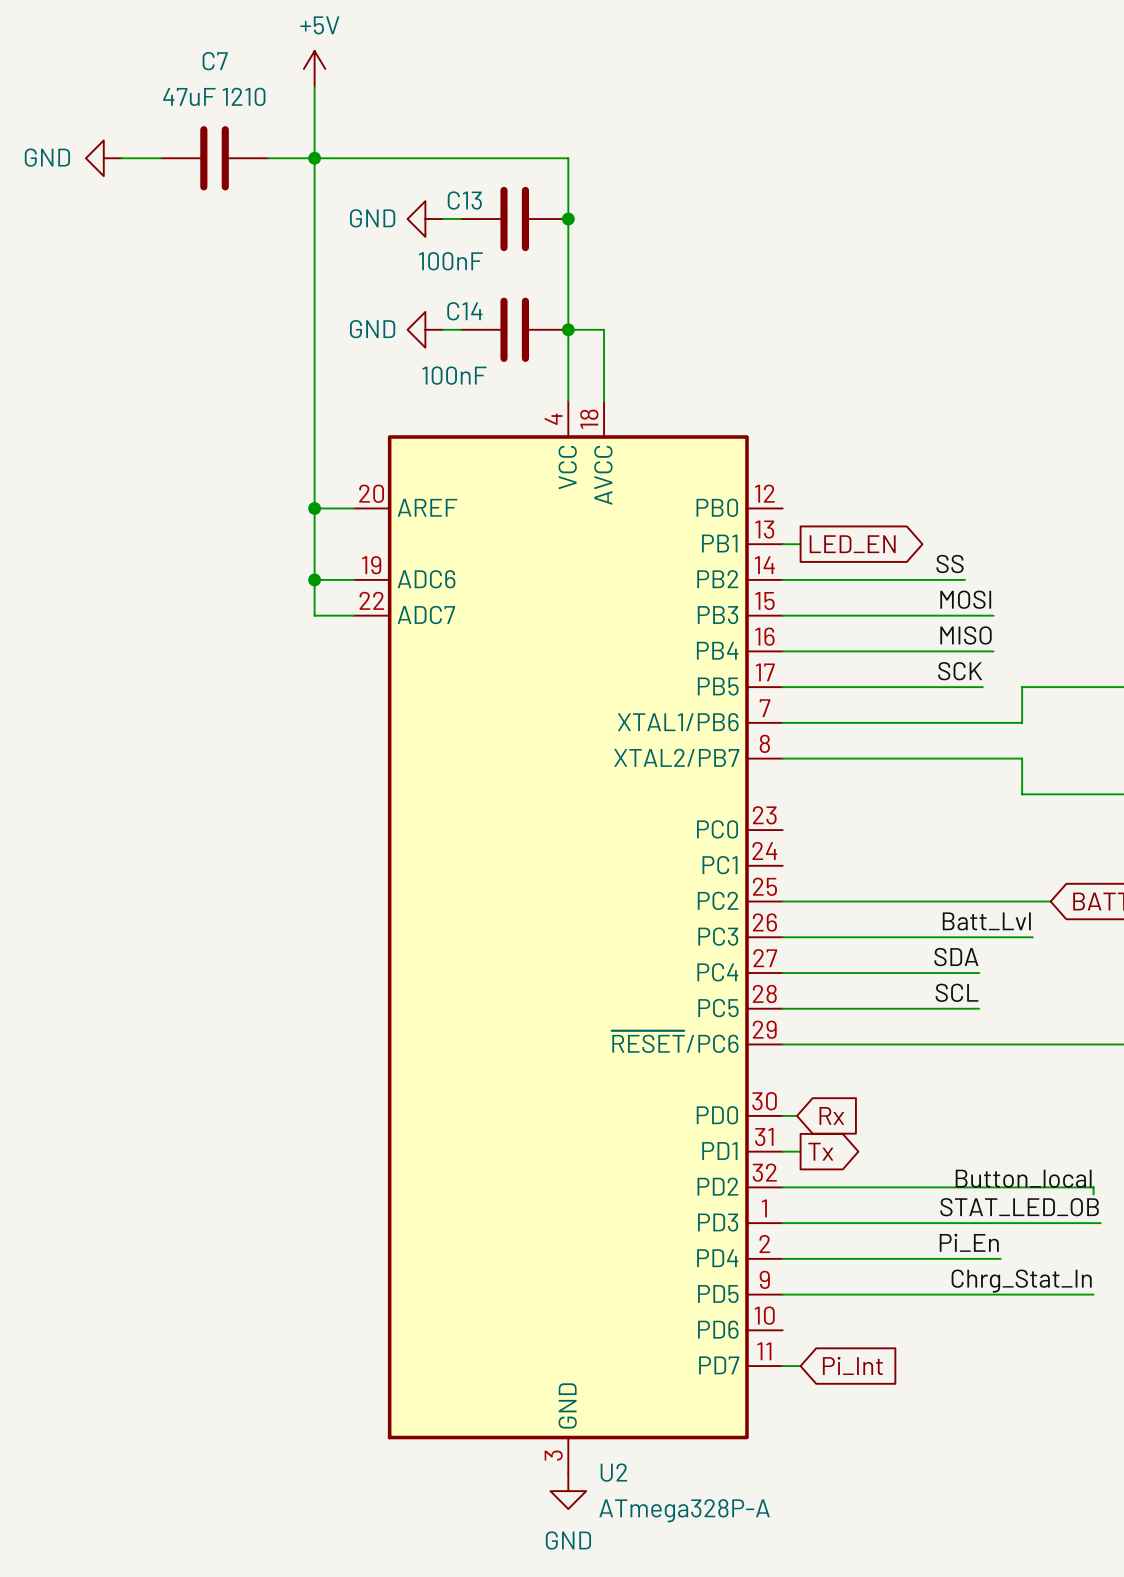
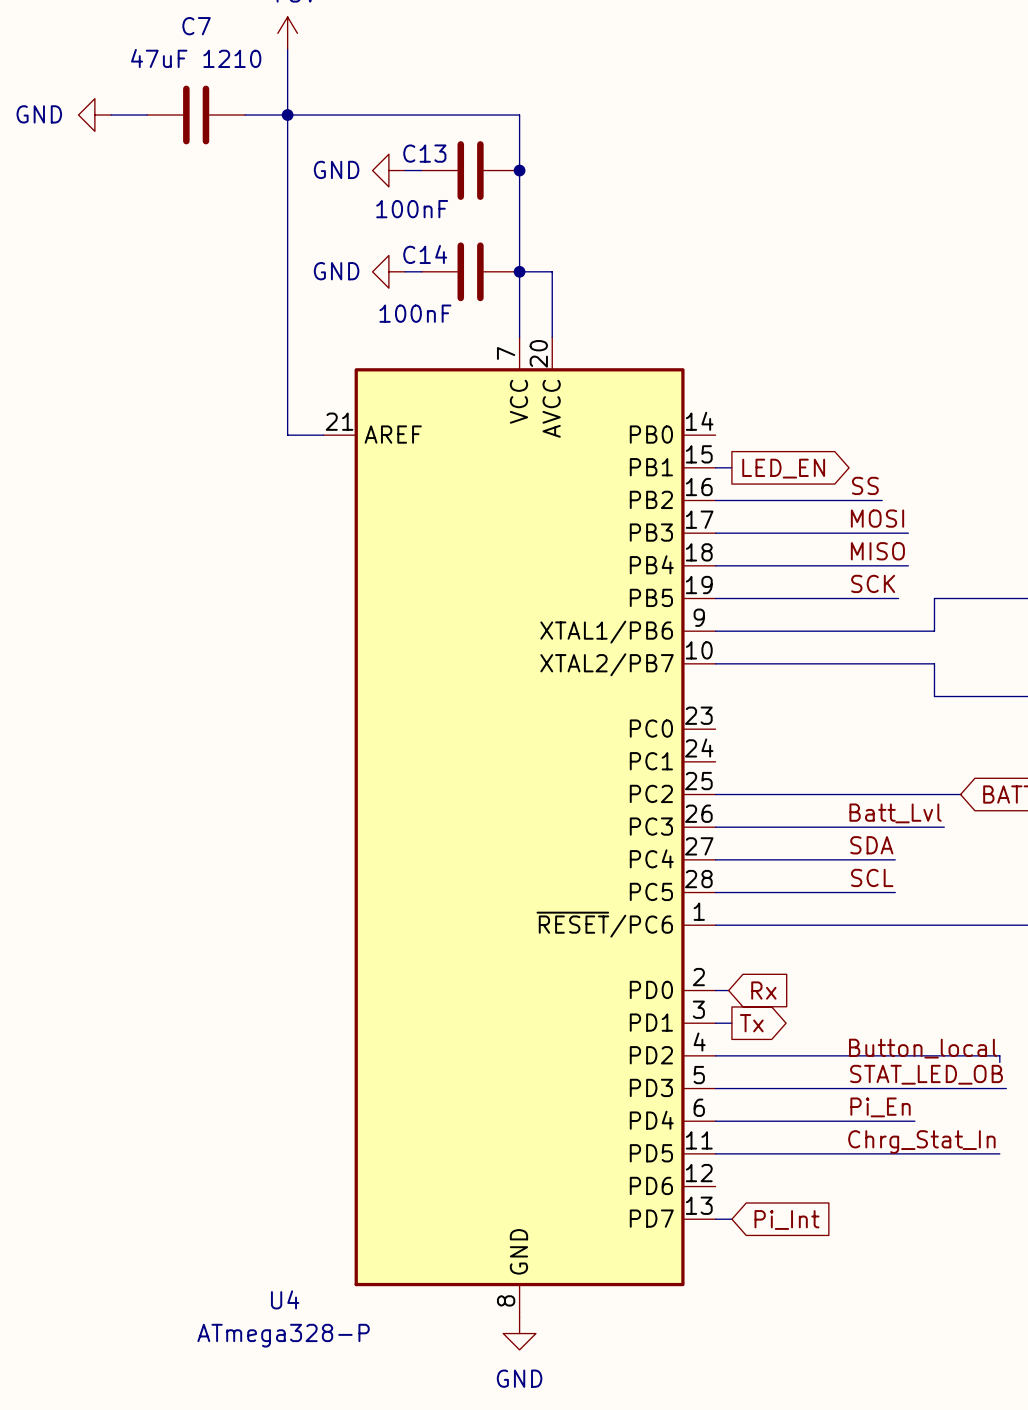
wire: (314, 508) (314, 615) (353, 615) -> none
junction: (314, 508) -> none
wire: (314, 579) (353, 579) -> none
junction: (314, 579) -> none
U2: ATmega328P-A (568, 937) -> none
U4: none -> ATmega328-P (519, 827)

